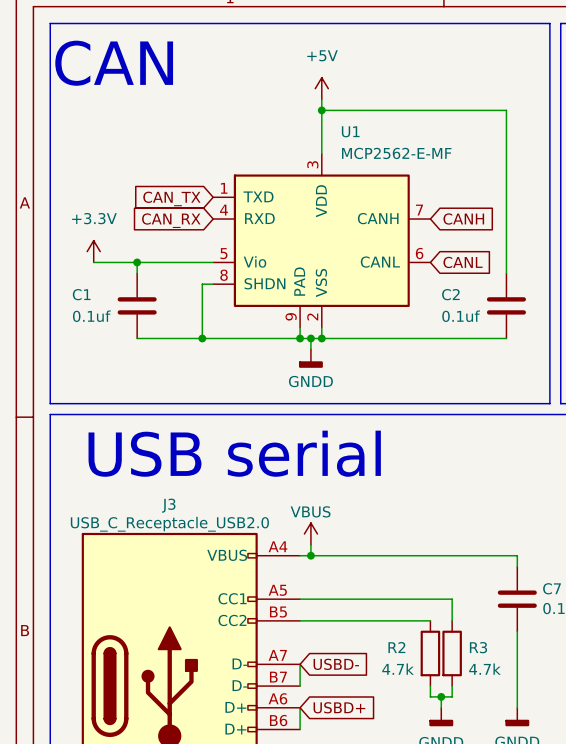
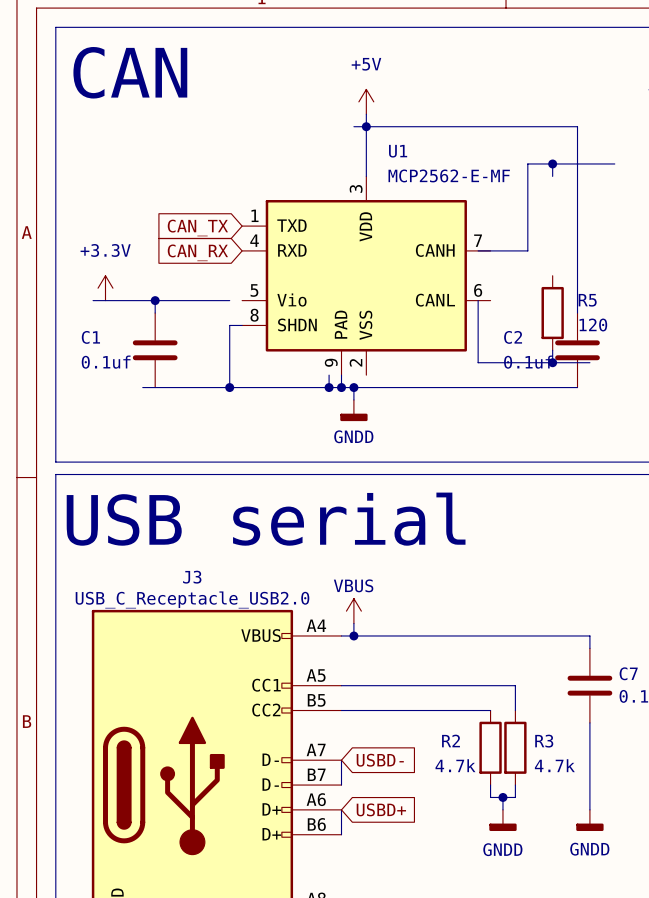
line: (549, 23) (549, 403) -> (627, 27) (639, 27)
line: (560, 23) (560, 403) -> (627, 462) (639, 462)
wire: none -> (353, 126) (366, 126)
wire: none -> (552, 163) (552, 176)
junction: none -> (552, 163)
wire: none -> (614, 163) (527, 163) (527, 250) (478, 250)
global label: CANH (463, 219) -> none
wire: none -> (93, 300) (105, 300)
wire: (202, 262) (213, 262) -> (142, 387) (155, 387)
wire: none -> (478, 300) (478, 362) (589, 362)
global label: CANL (463, 262) -> none
R5: none -> 120 (552, 313)
wire: none -> (552, 350) (552, 362)
junction: none -> (552, 362)
wire: (321, 327) (321, 338) -> (329, 375) (329, 387)
junction position: (321, 338) -> (329, 387)

